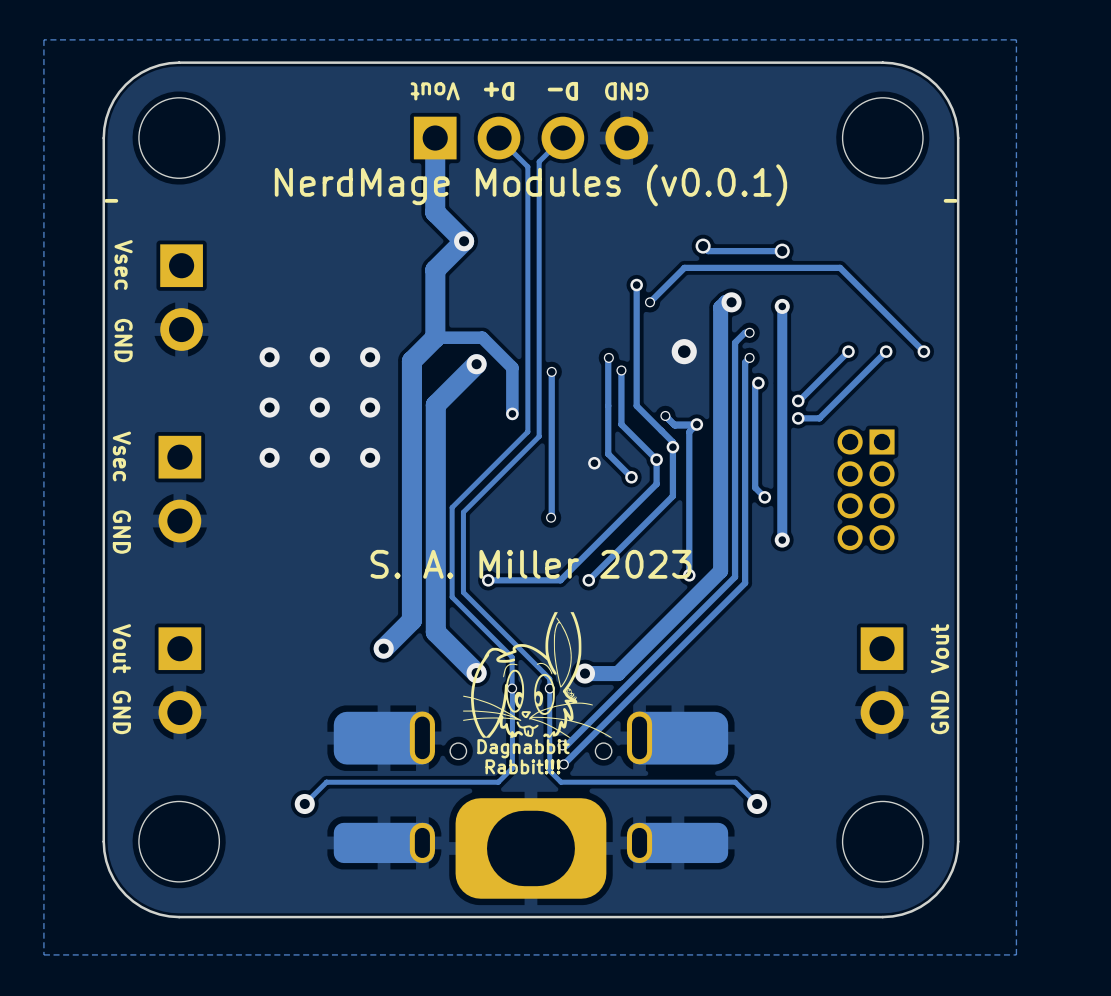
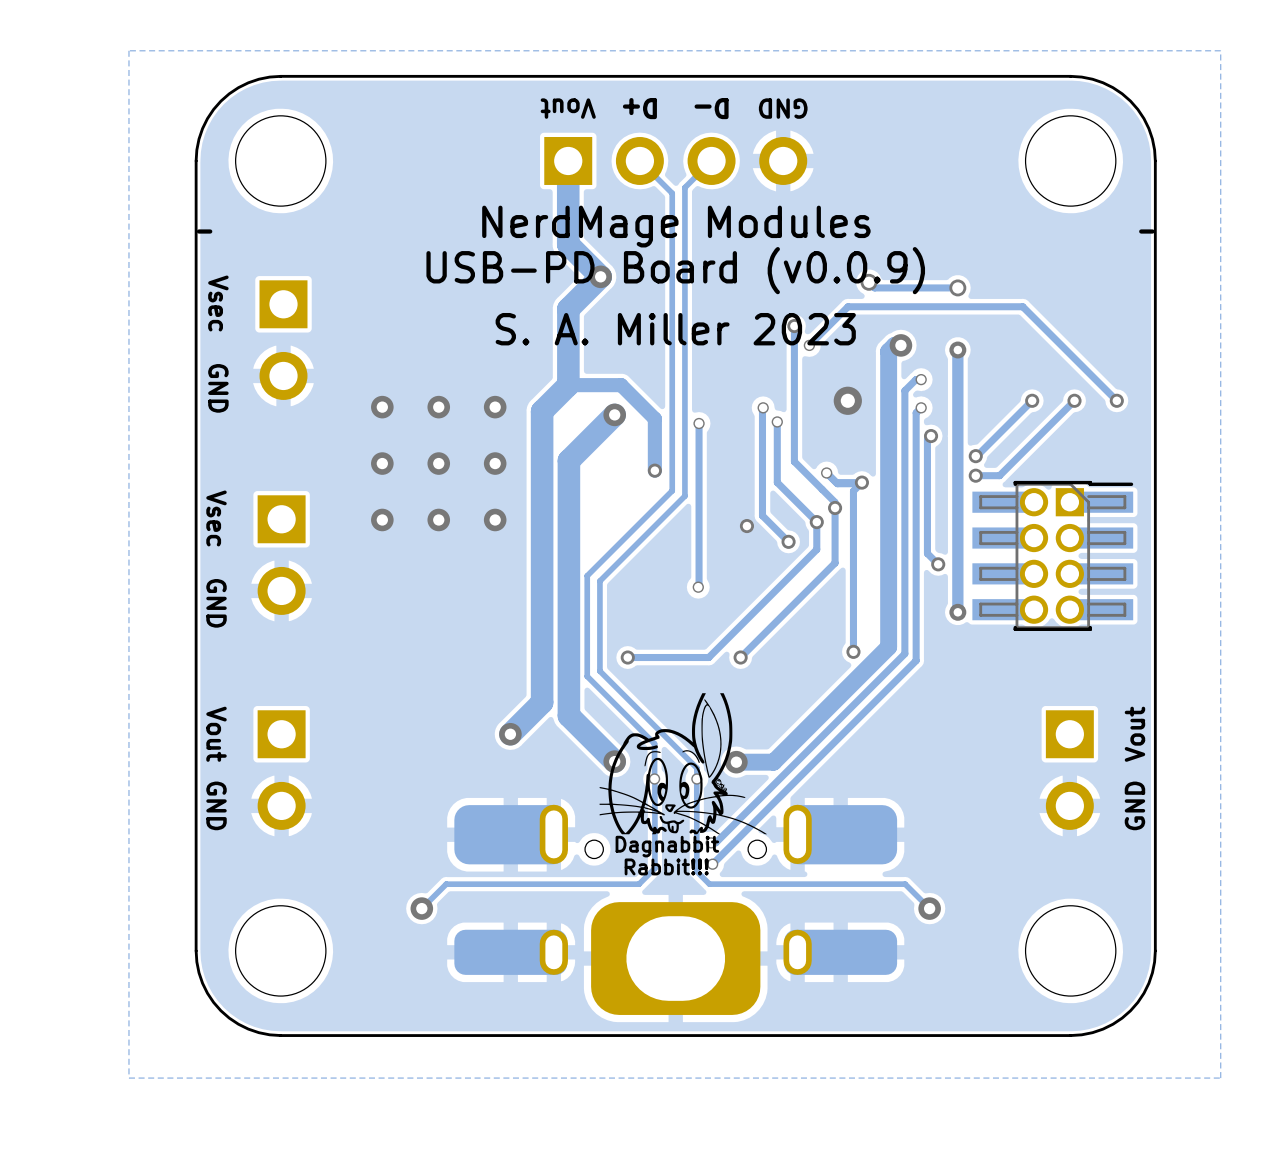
text: NerdMage Modules (v0.0.1) (530, 185) -> NerdMage Modules (676, 226)
text: none -> USB-PD Board (v0.0.9) (675, 270)
part footprint: [837, 429, 895, 551] -> [972, 480, 1134, 631]
text position: S. A. Miller 2023 (530, 564) -> S. A. Miller 2023 (675, 329)

